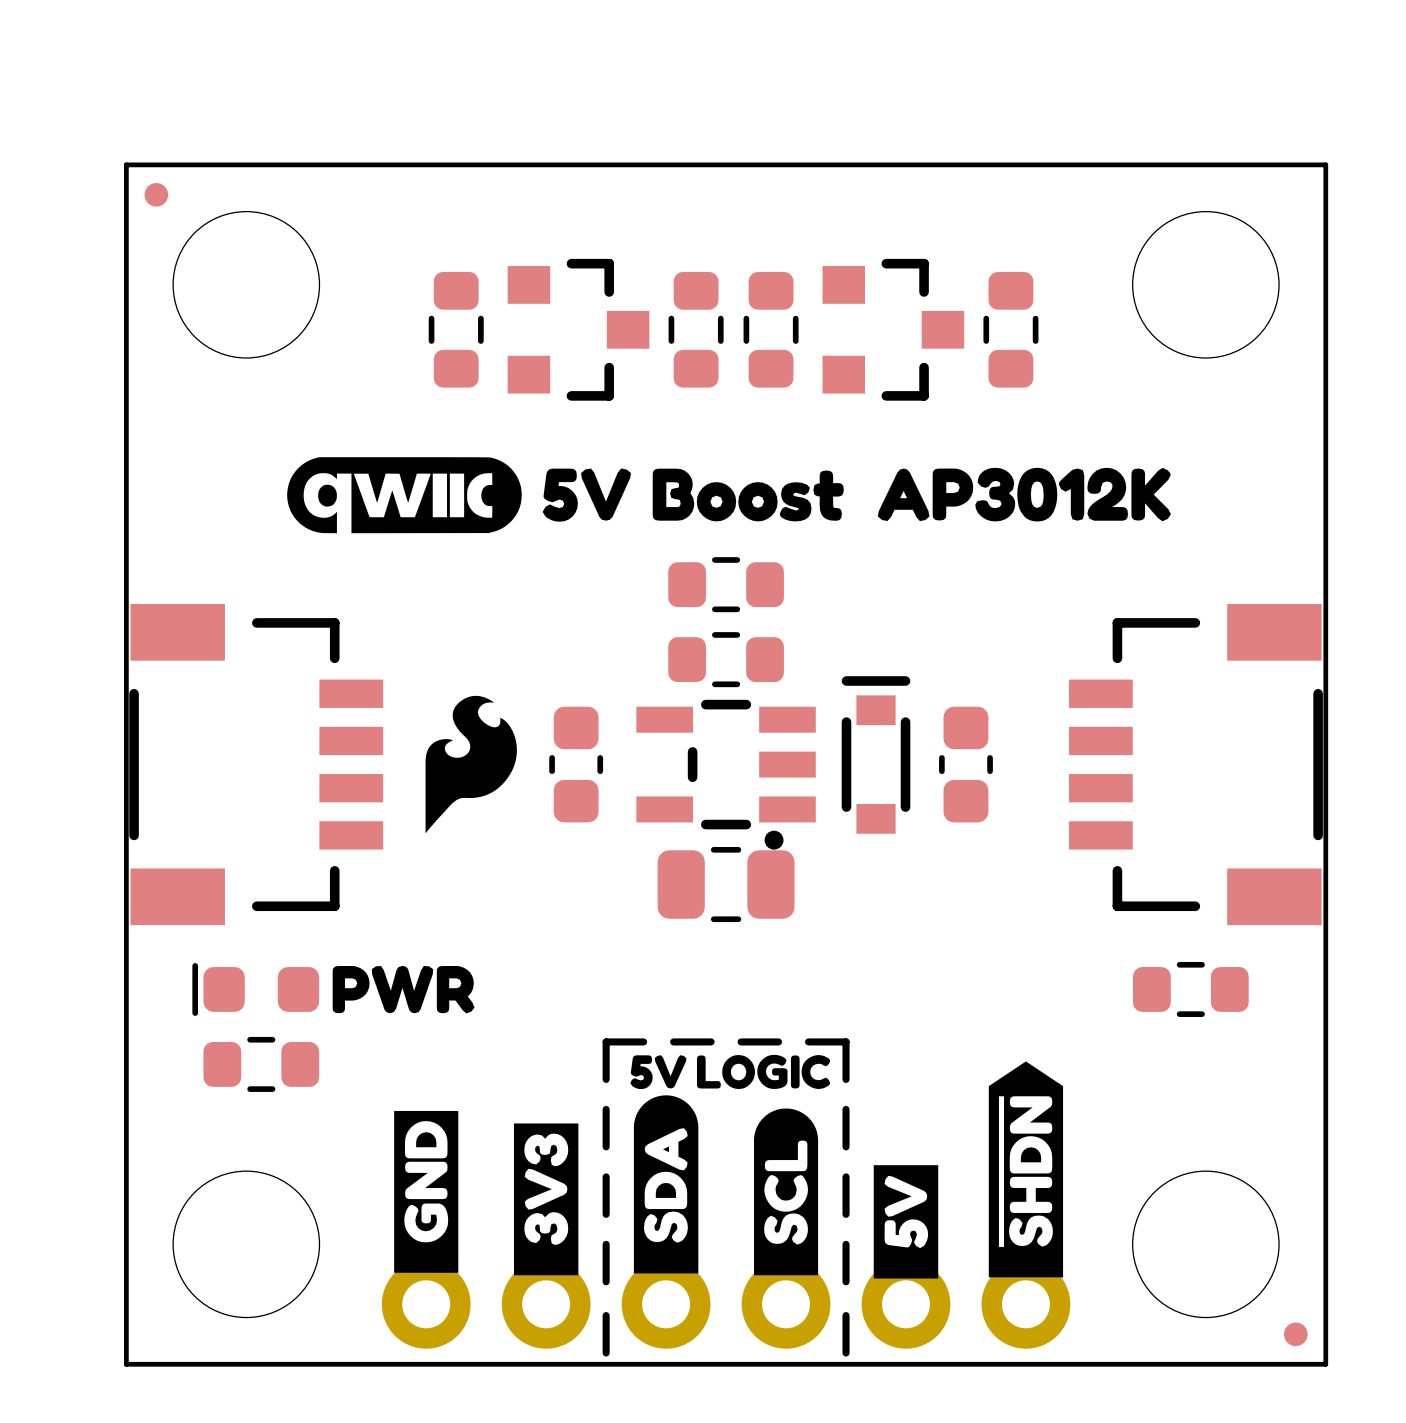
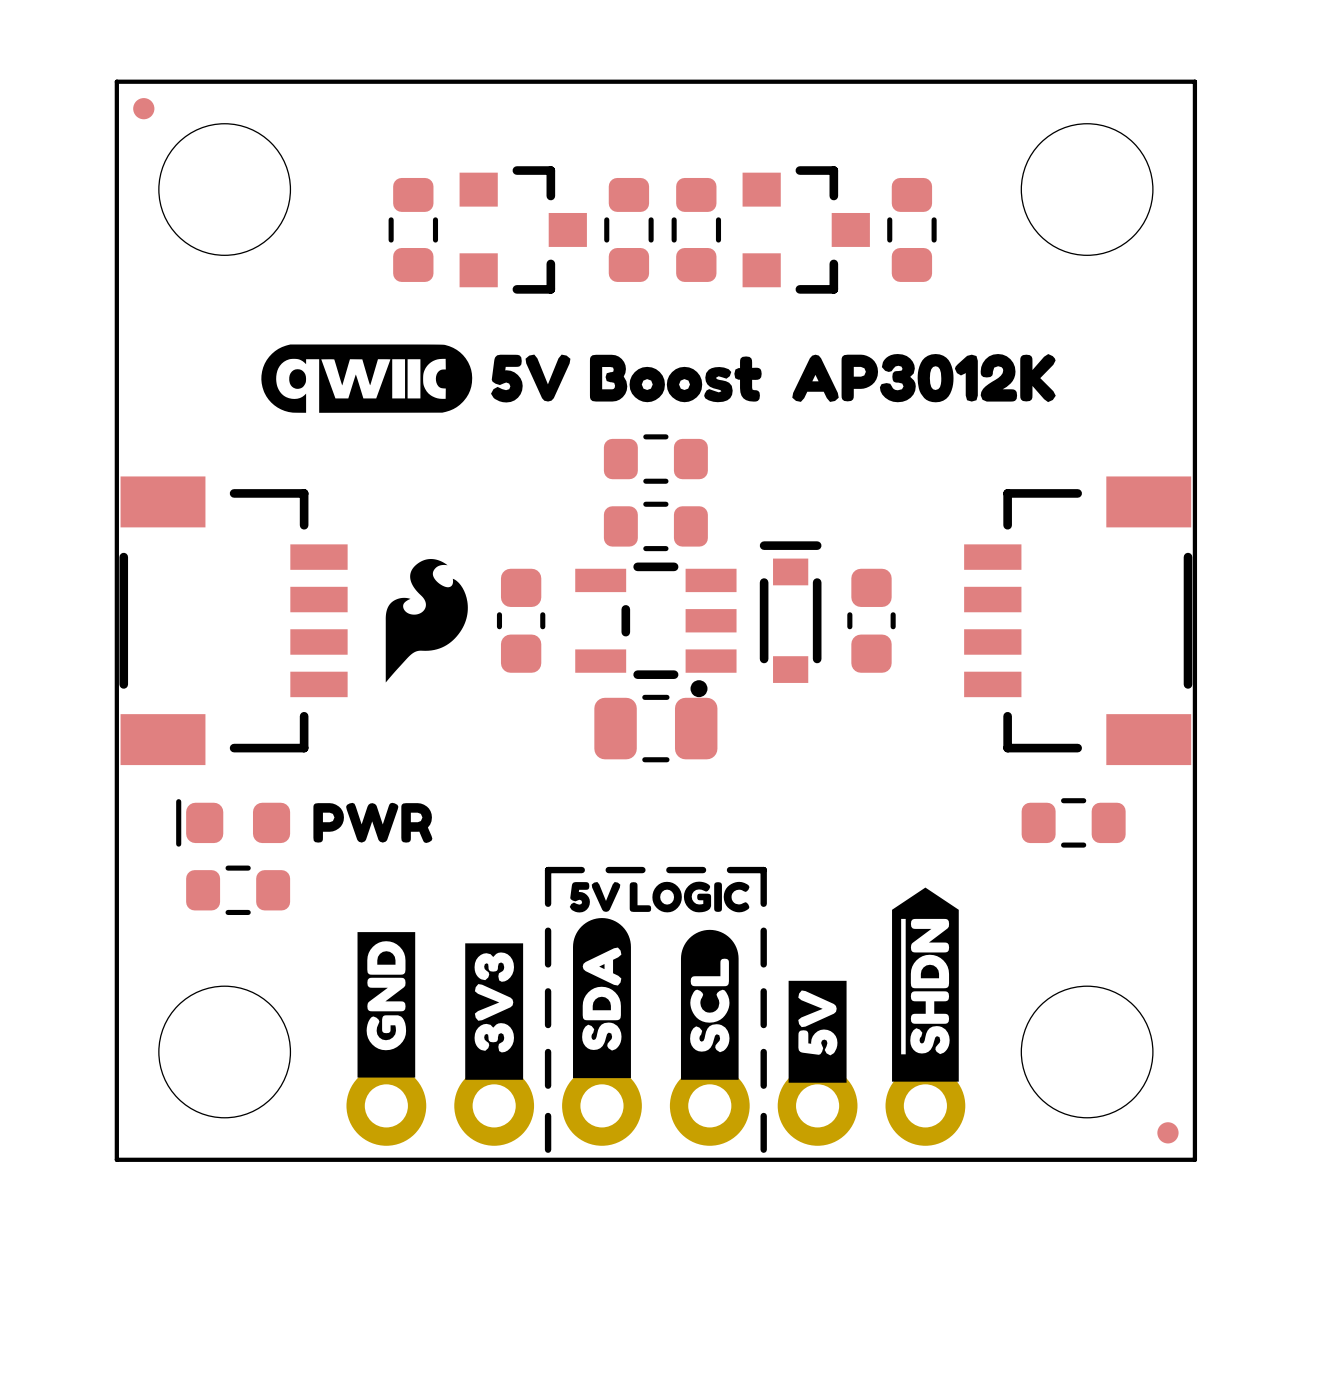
drawing shape: [332, 965, 475, 1014] -> [313, 802, 433, 843]

